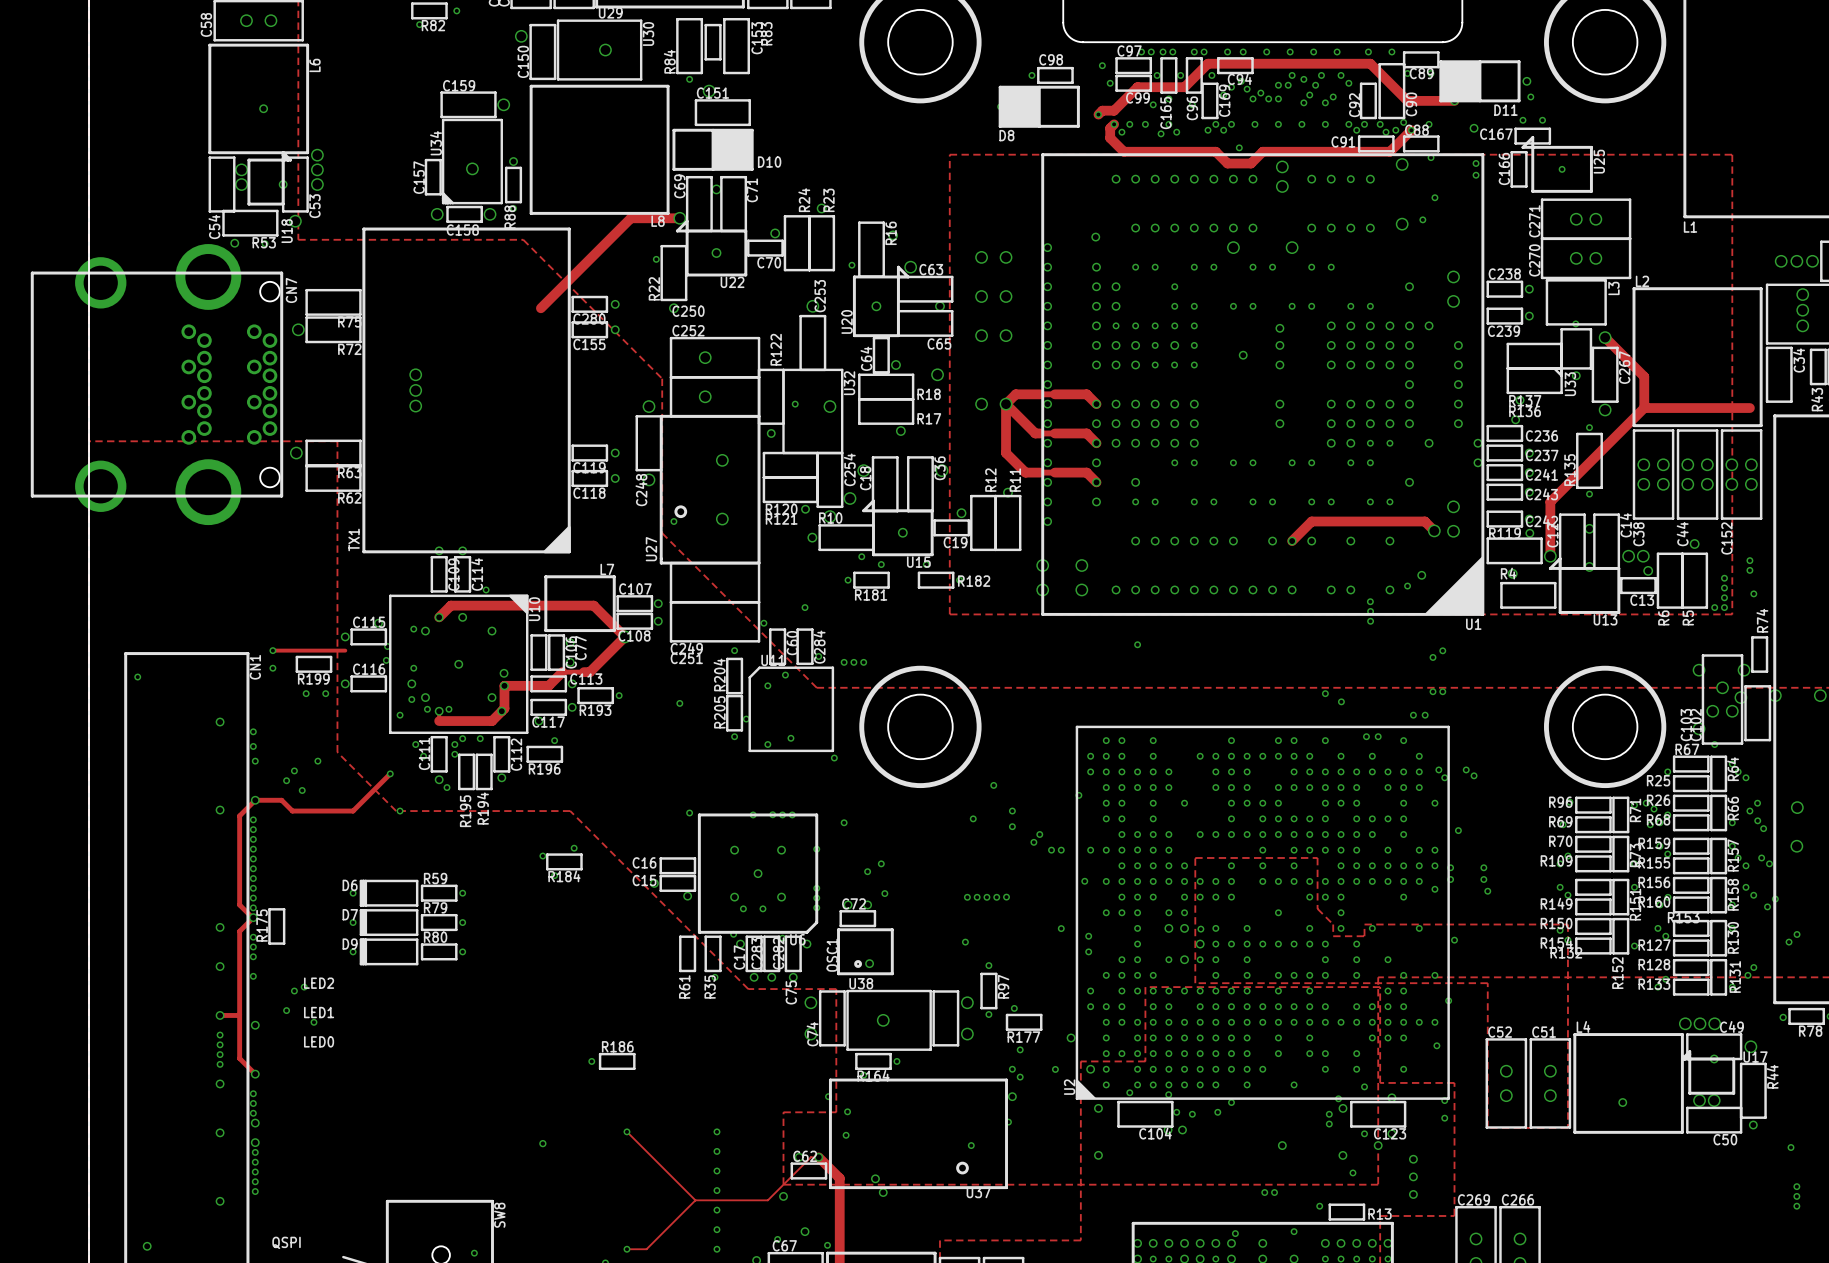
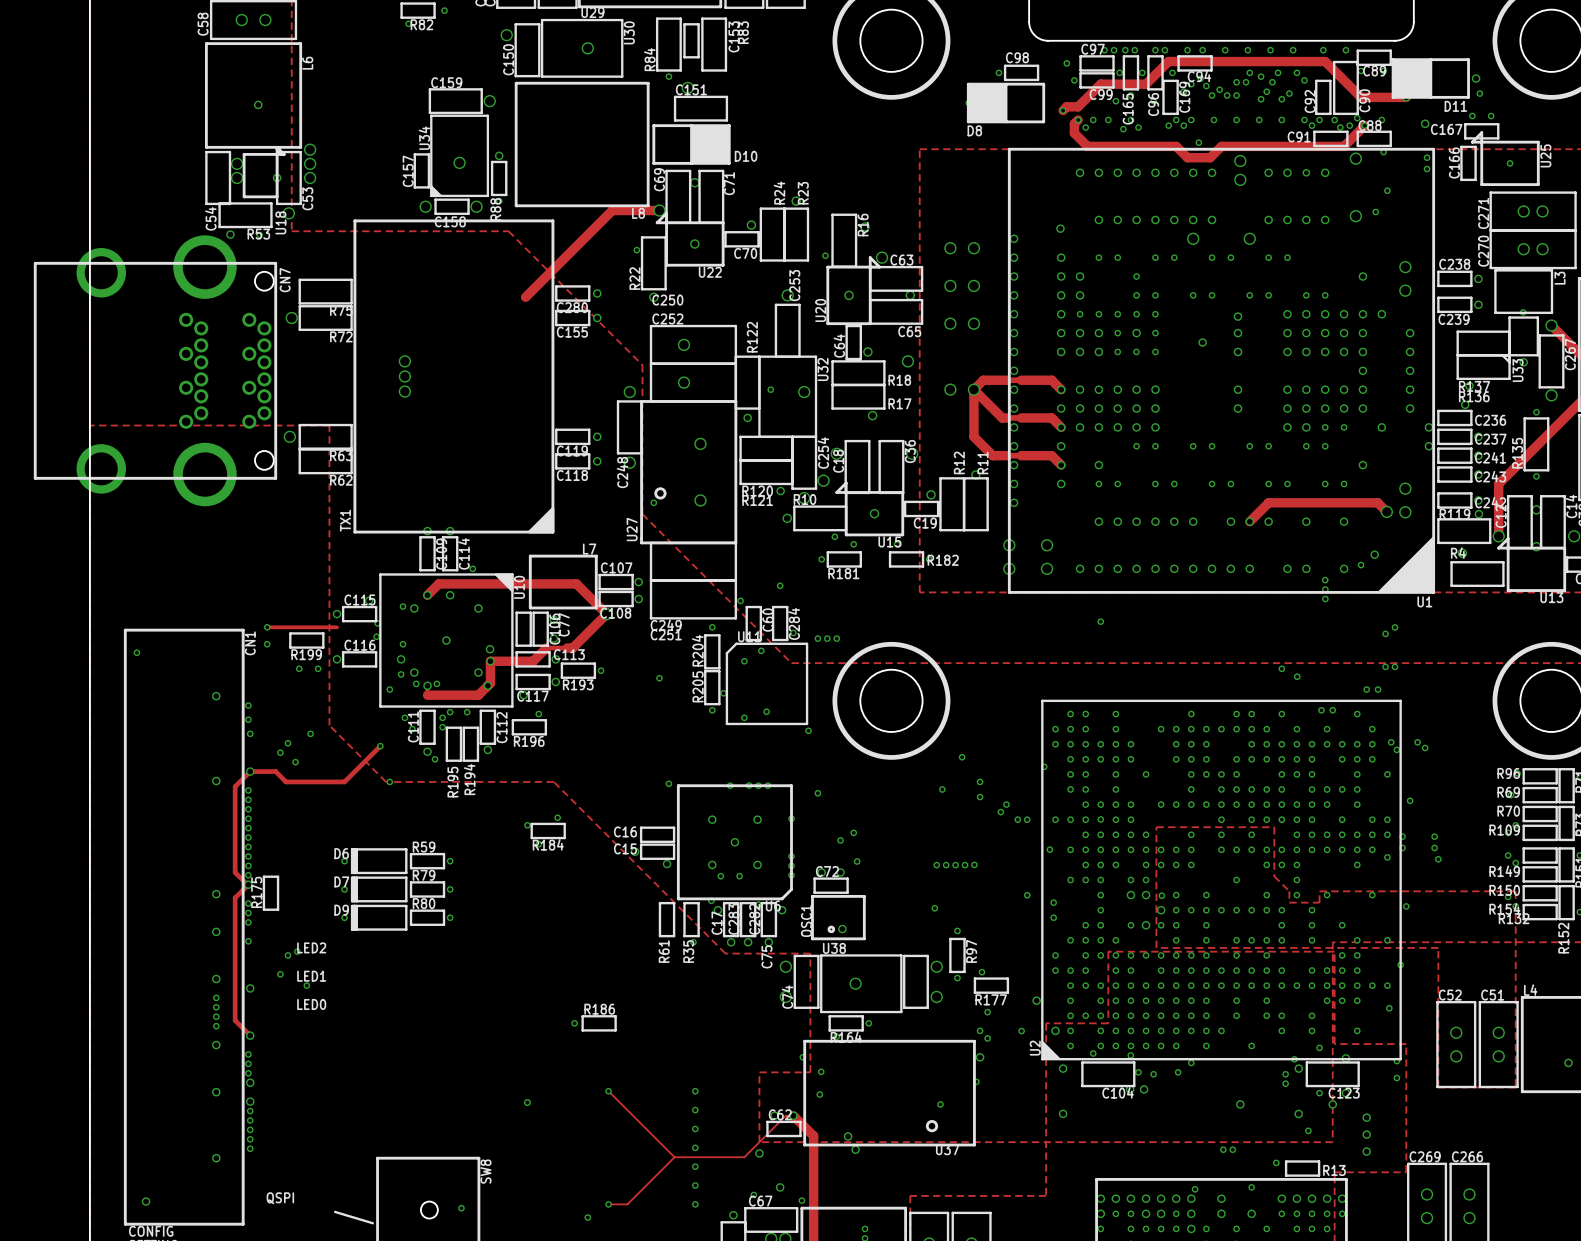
track: (239, 1014) (220, 1015) -> none

